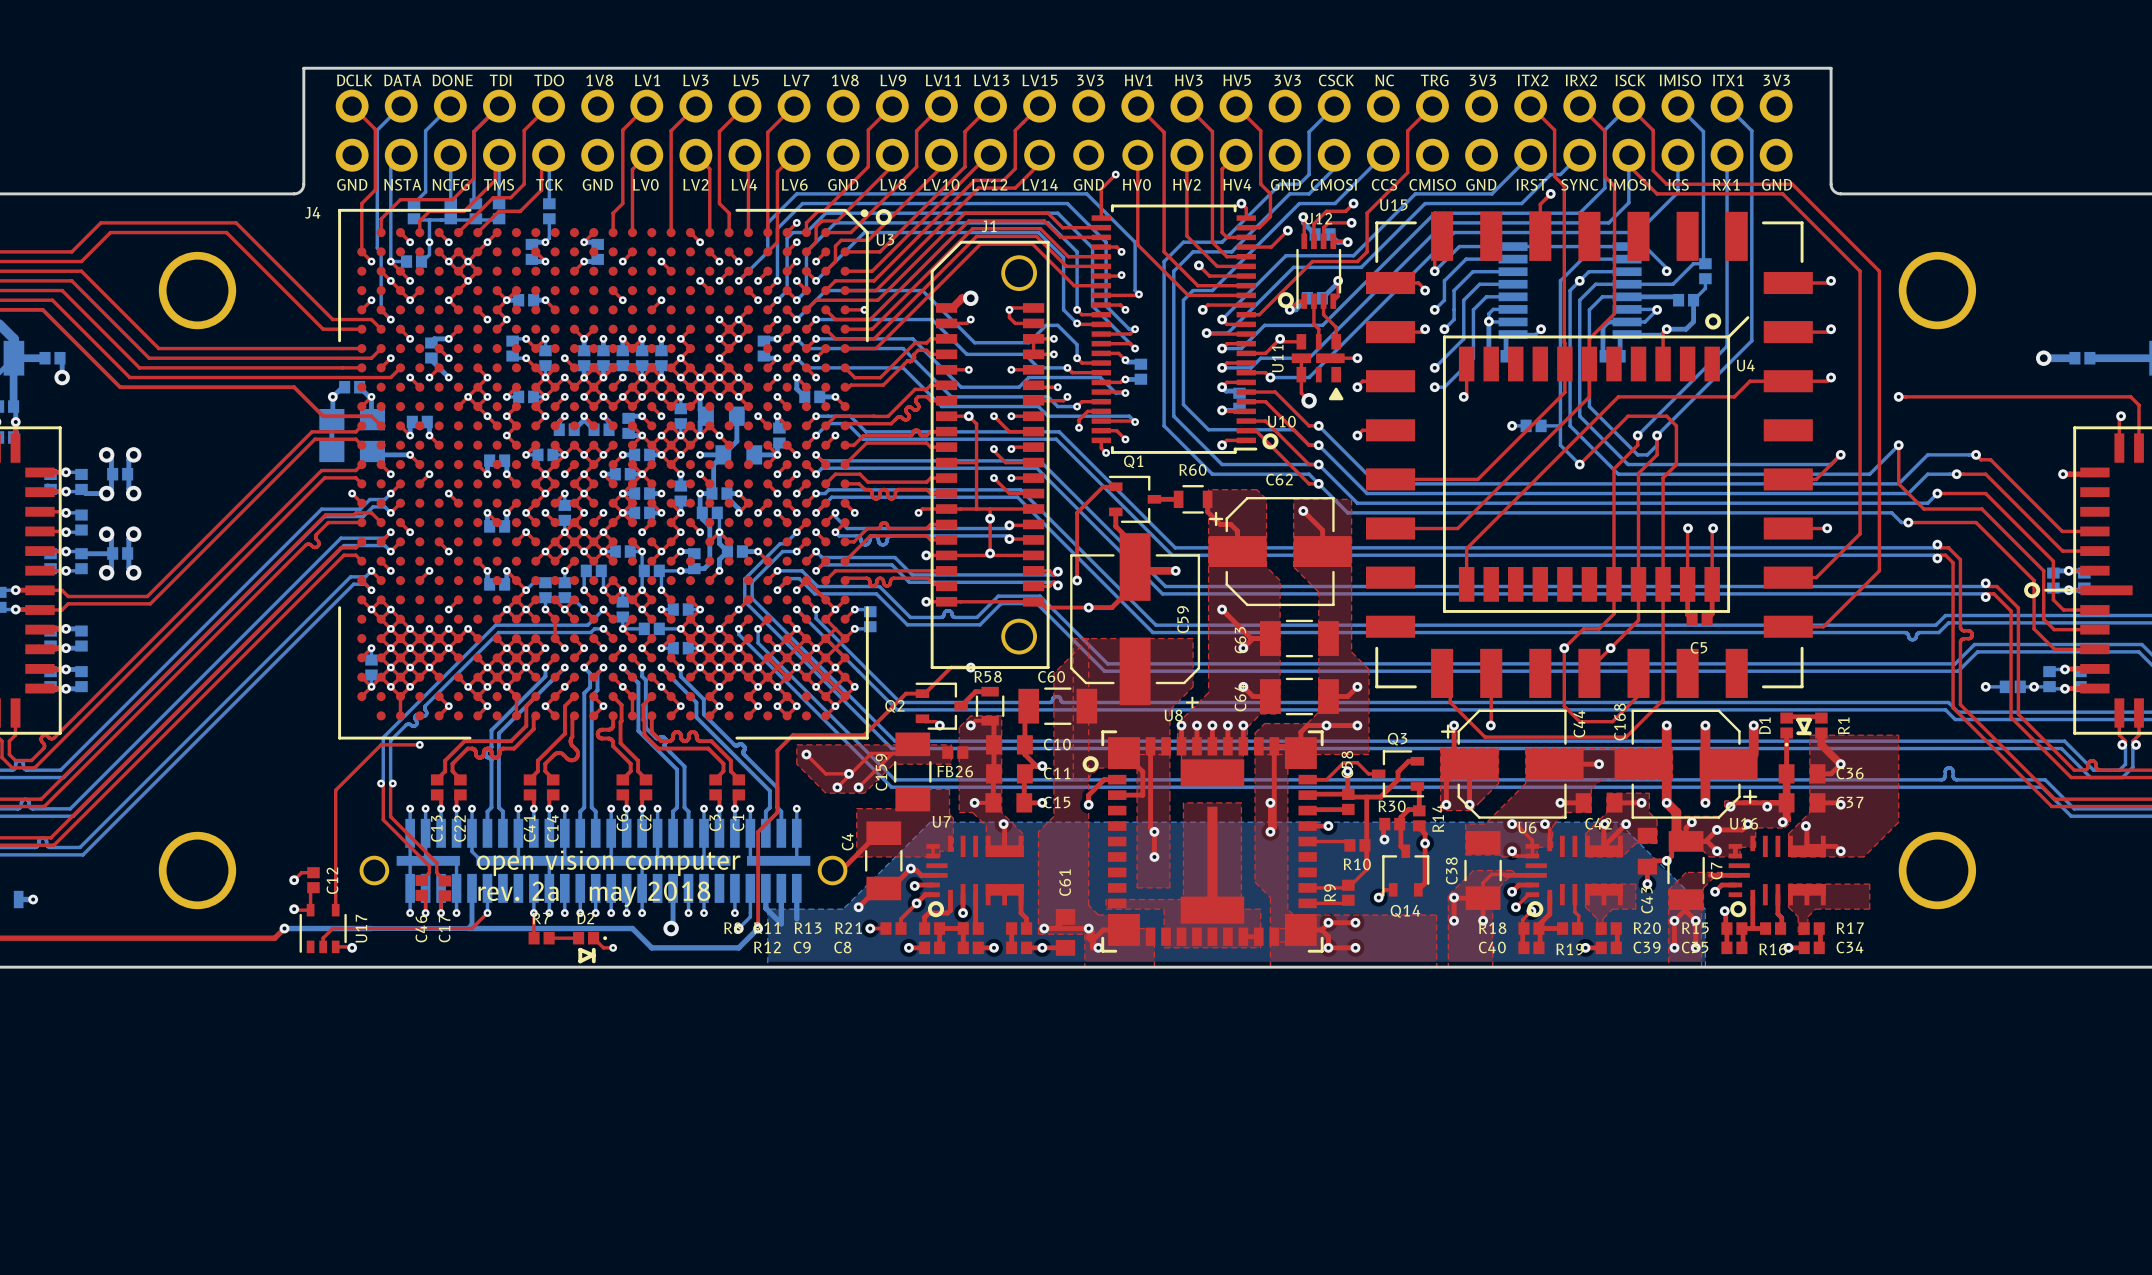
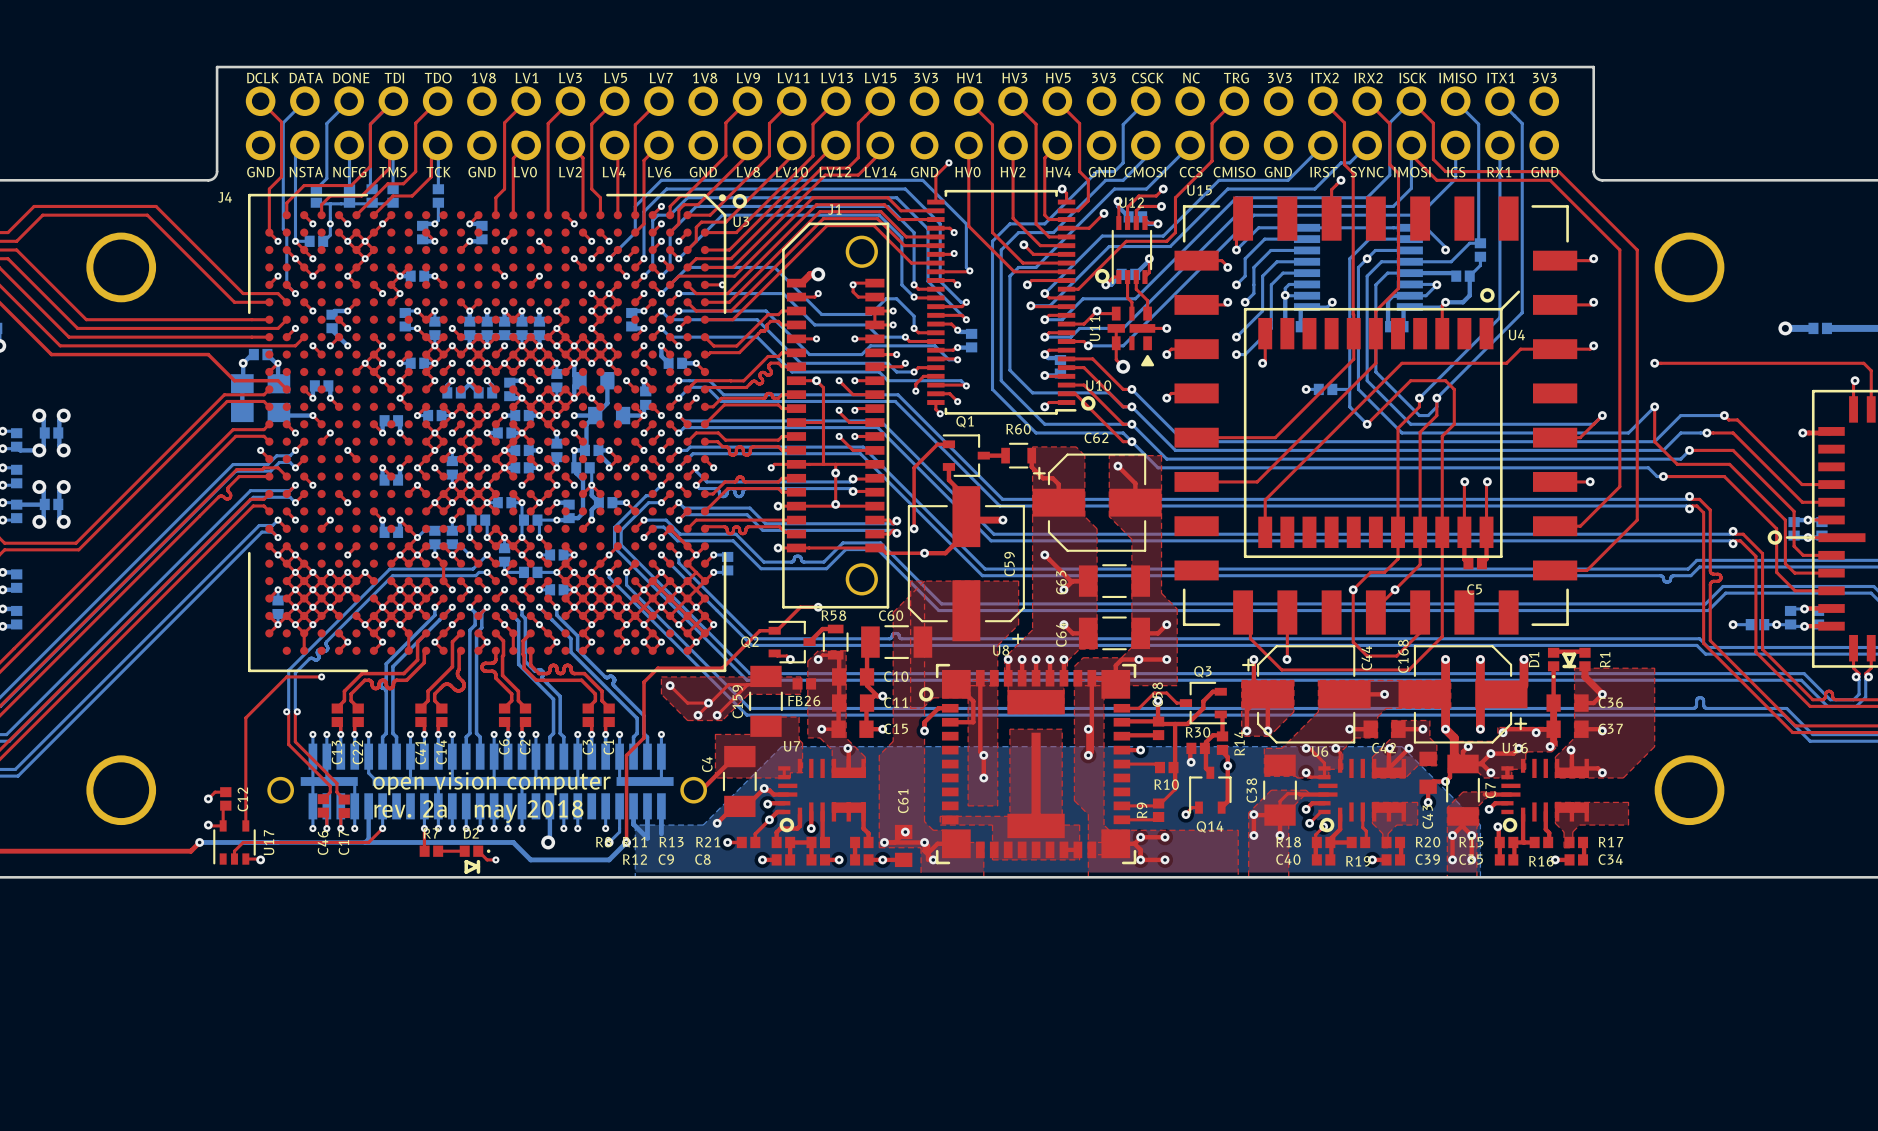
via: none -> (905, 832)

